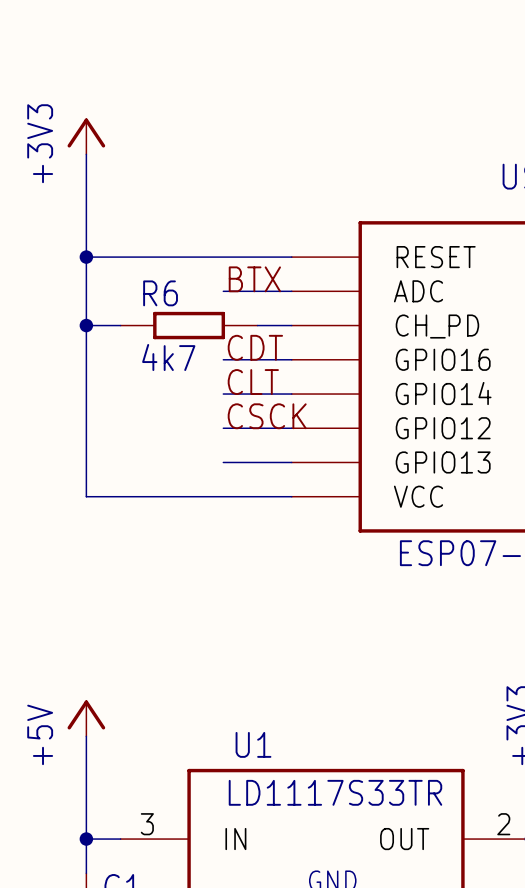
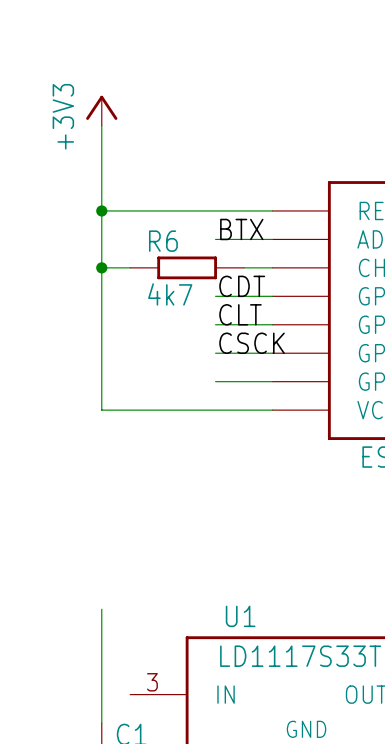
power symbol: +5V (86, 718) -> none
wire: (86, 839) (120, 839) -> none
junction: (86, 839) -> none

